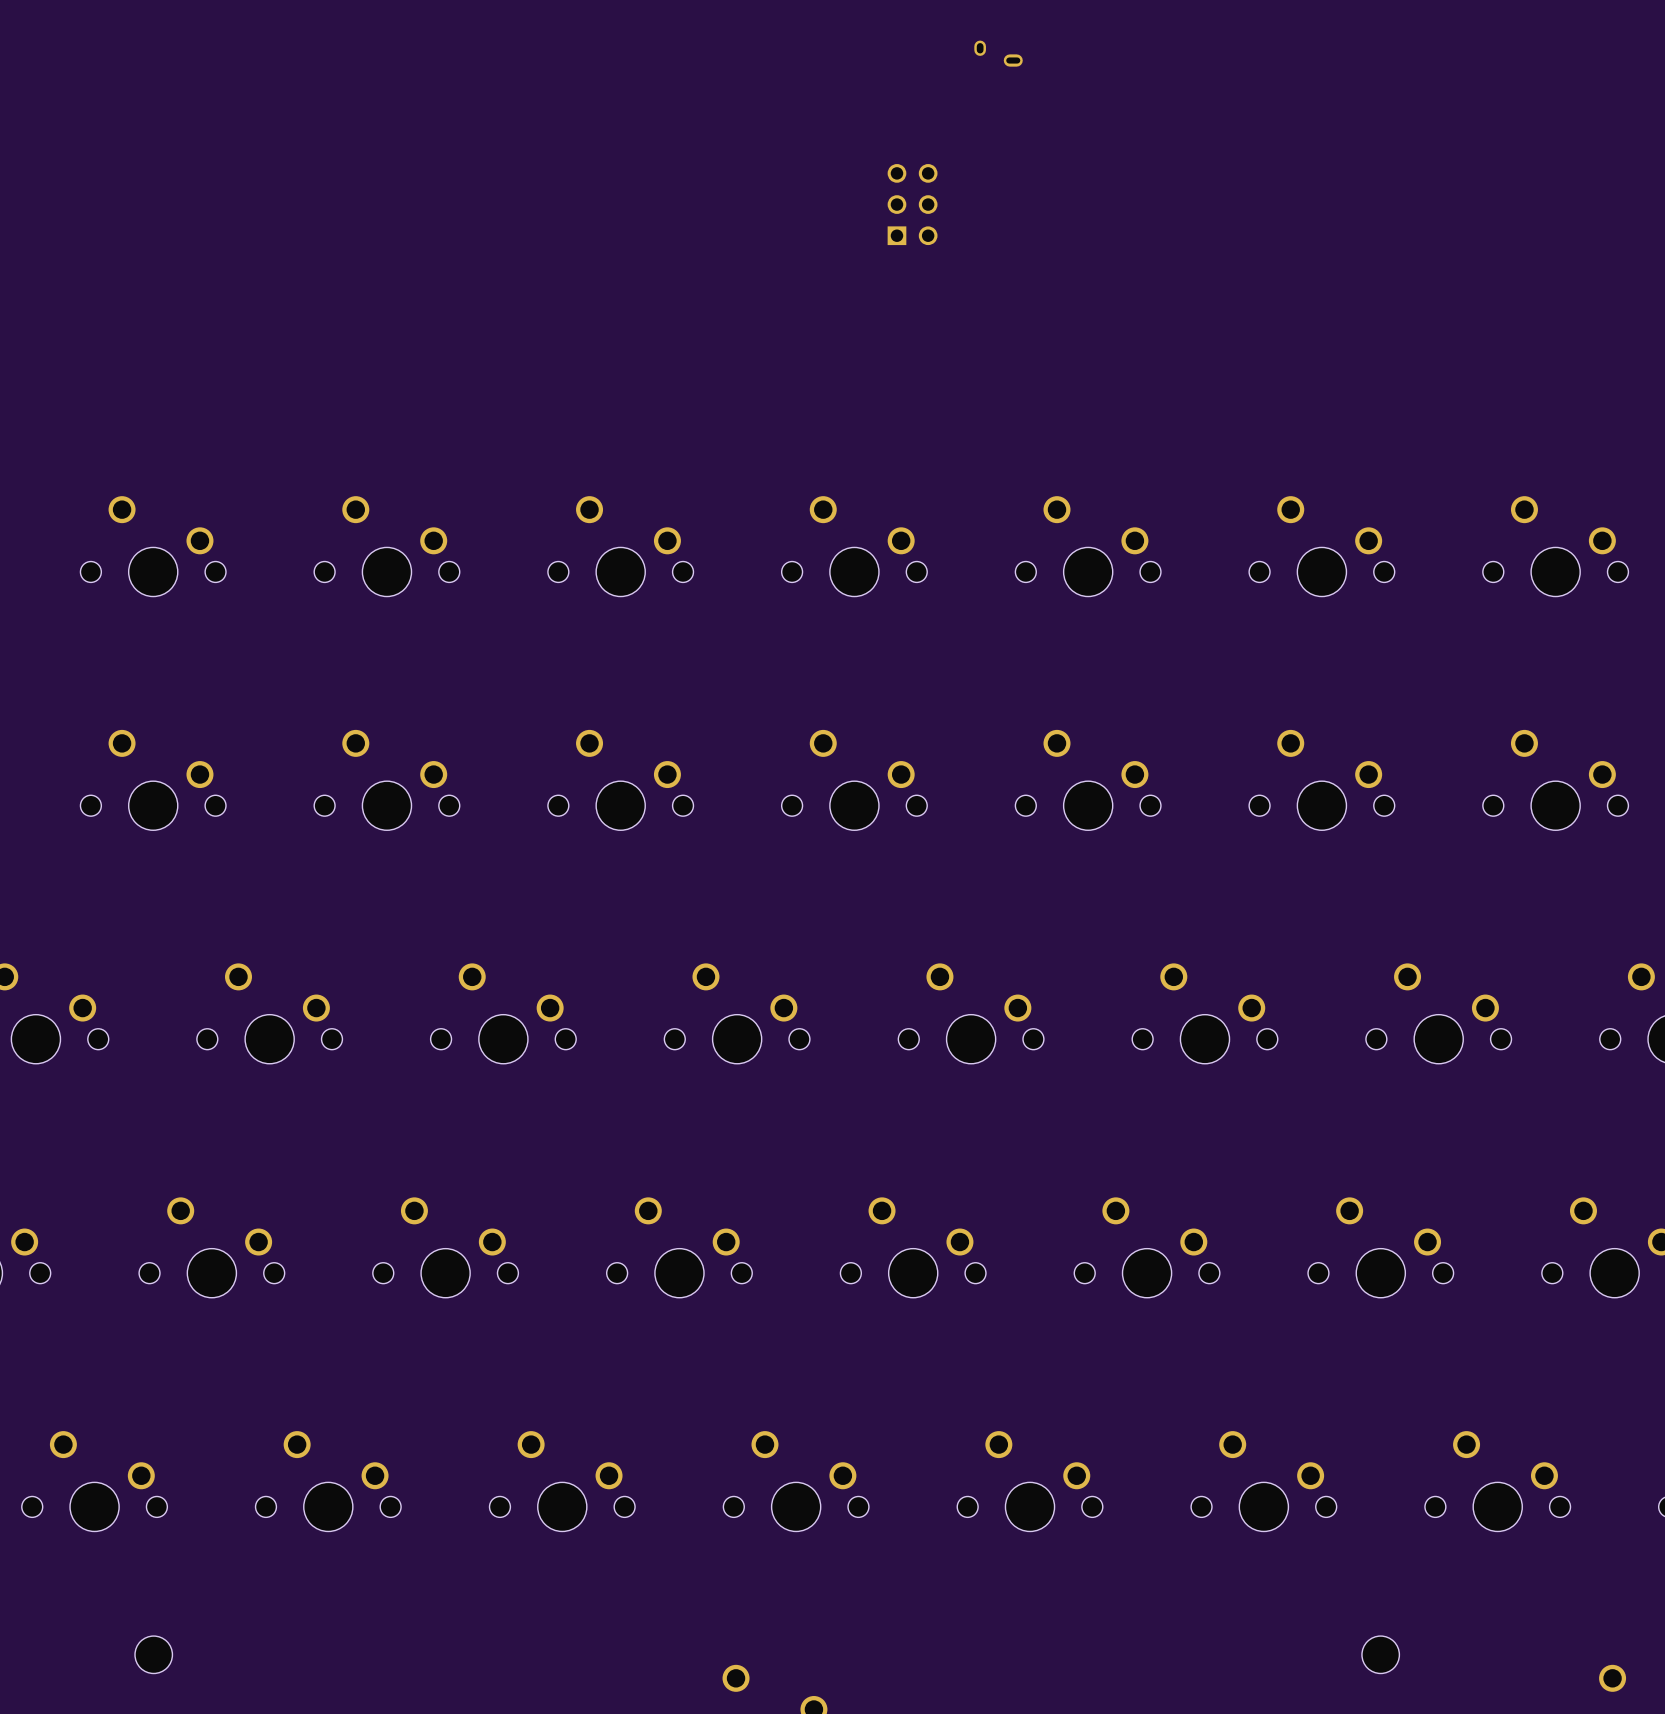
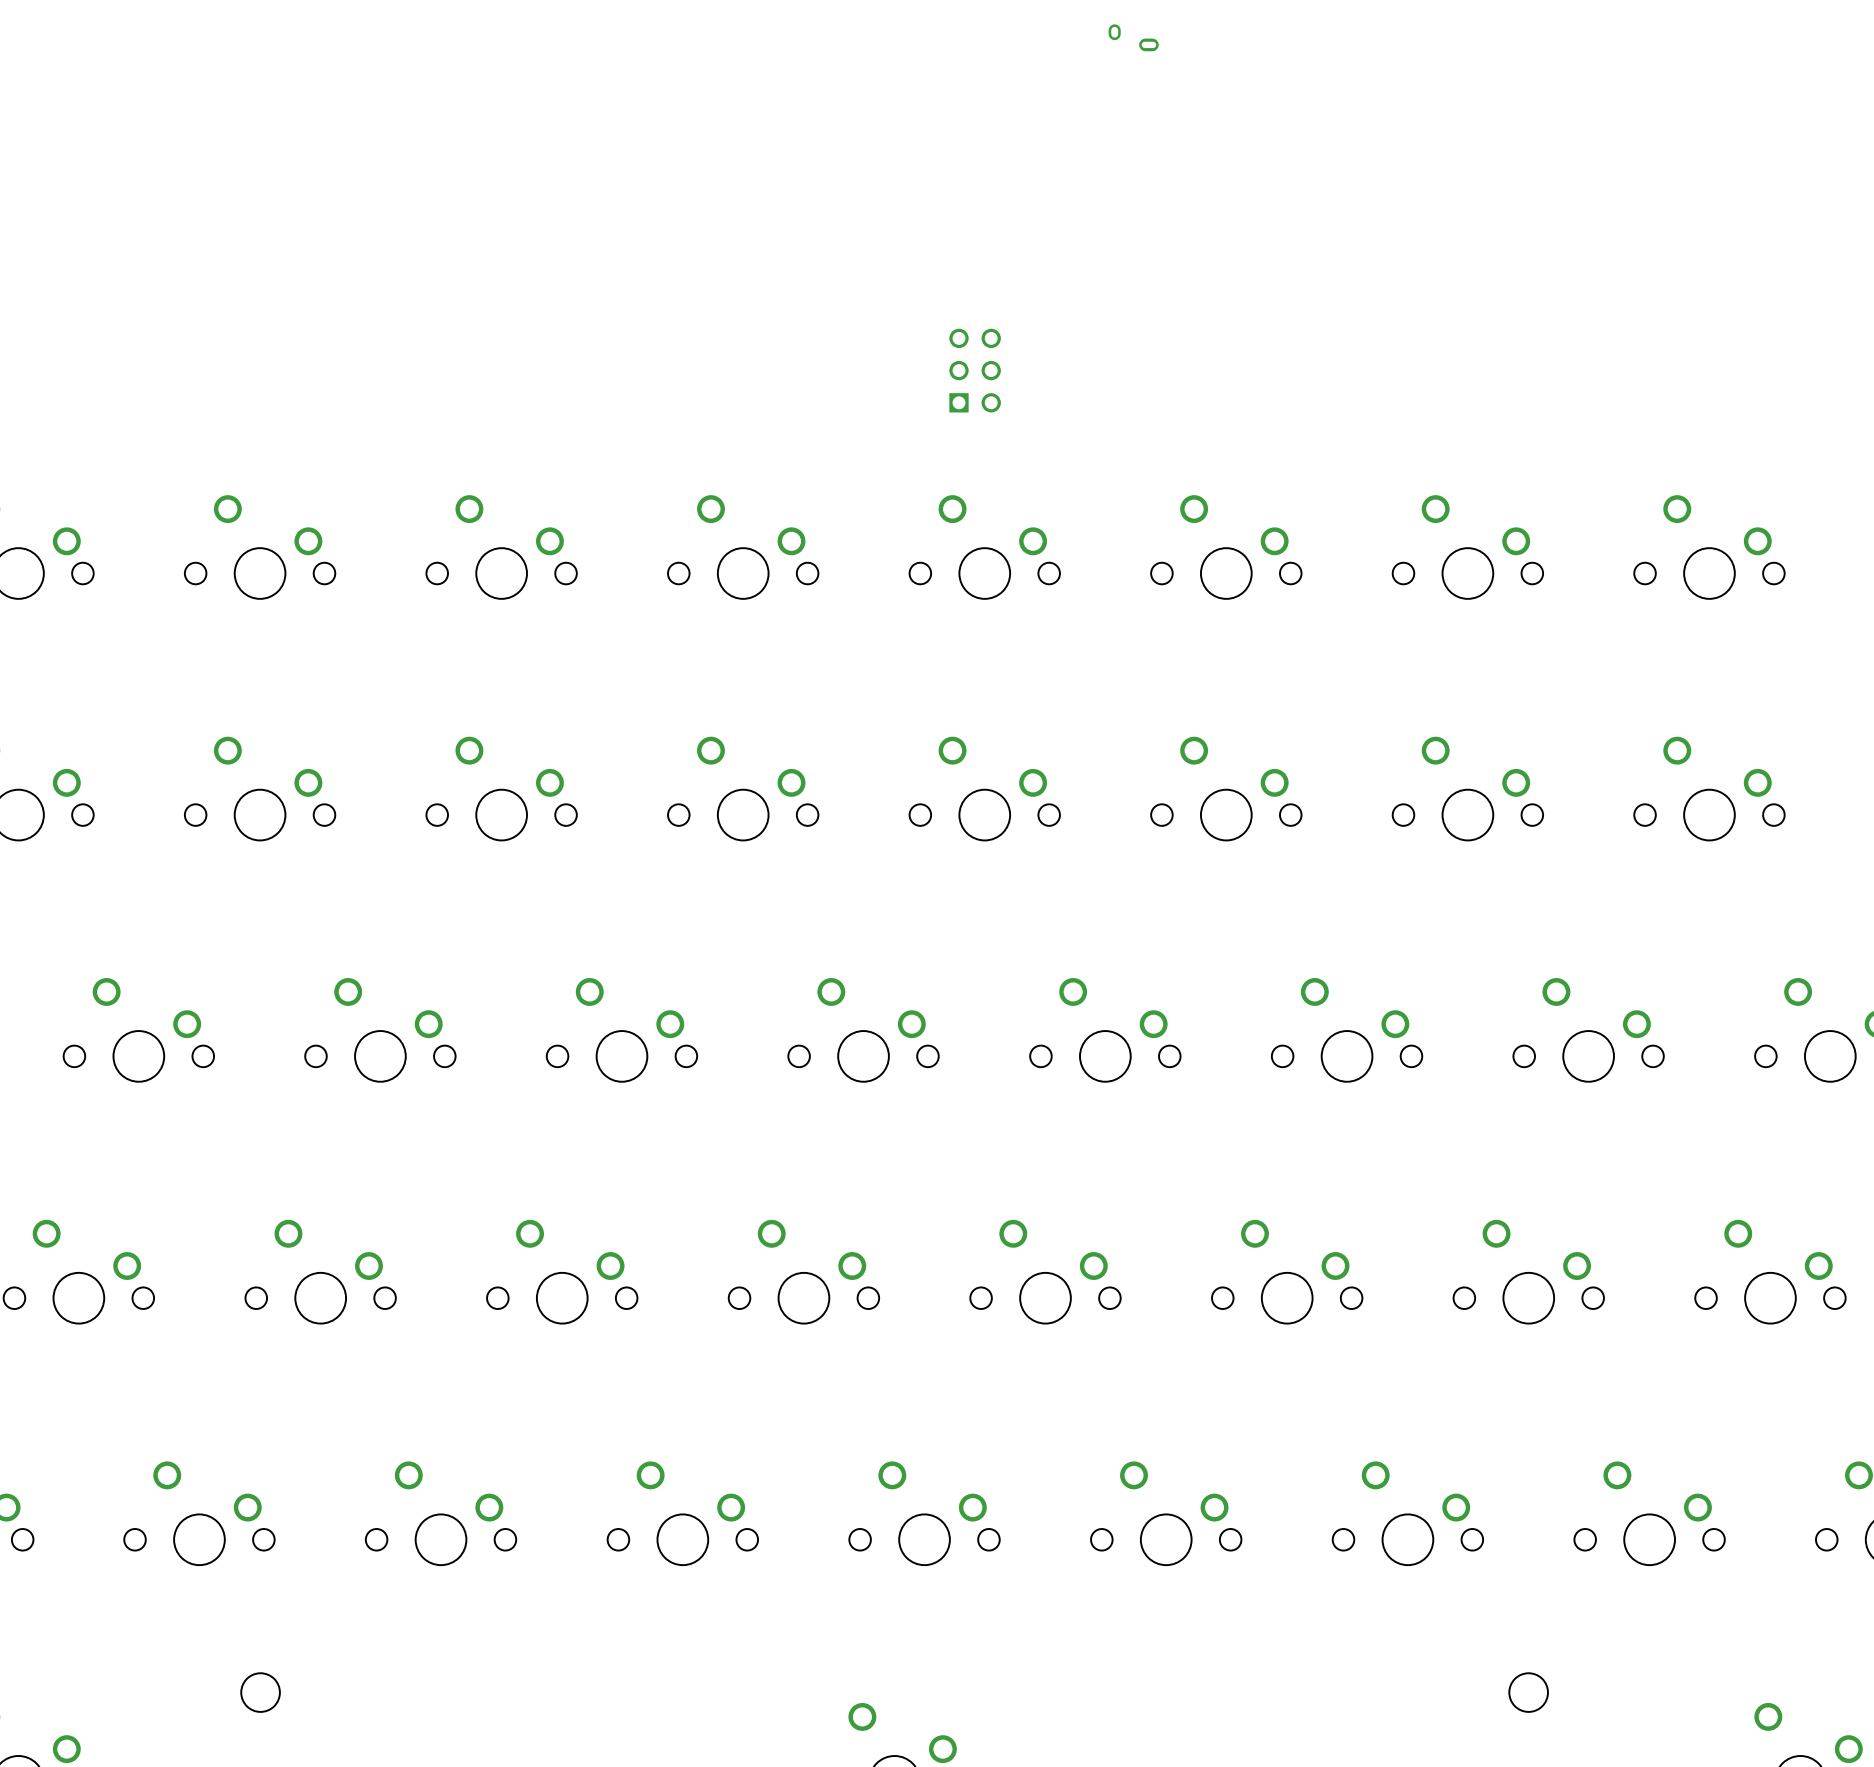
part position: (912, 204) -> (975, 370)

